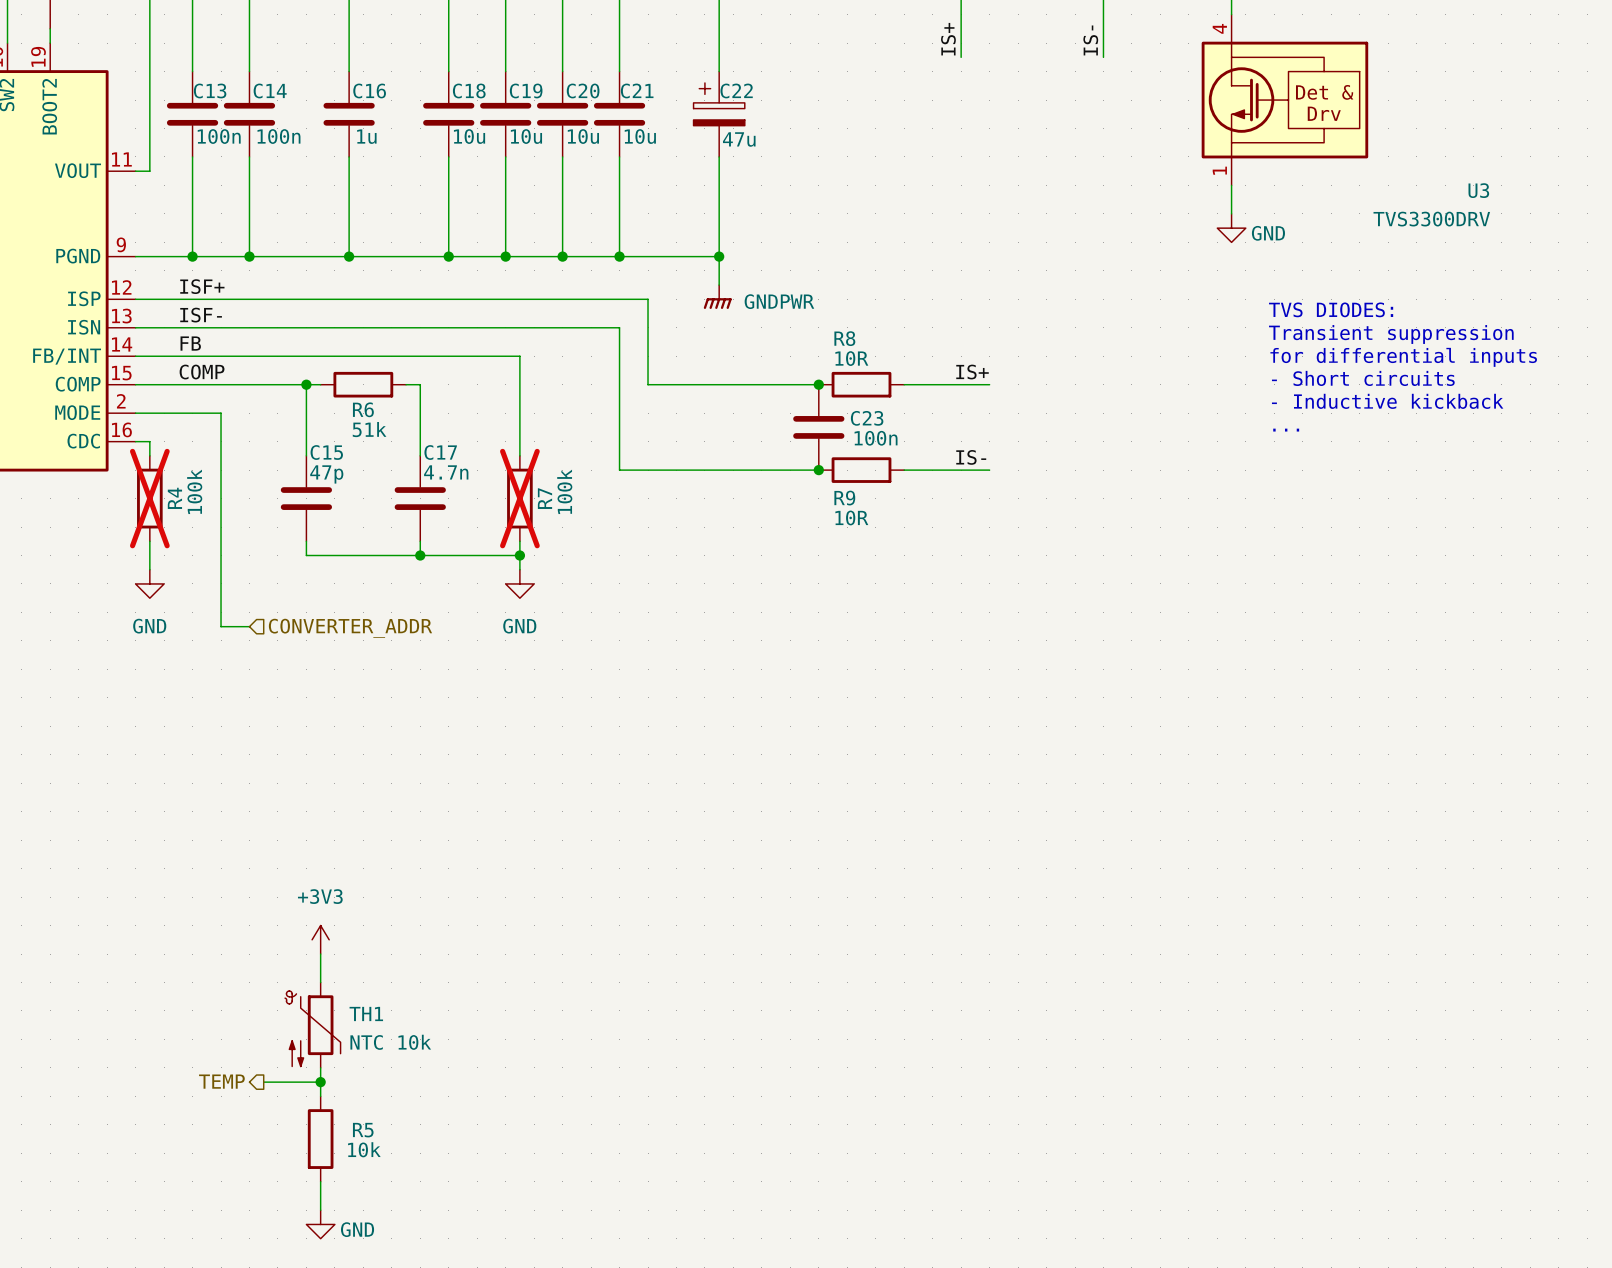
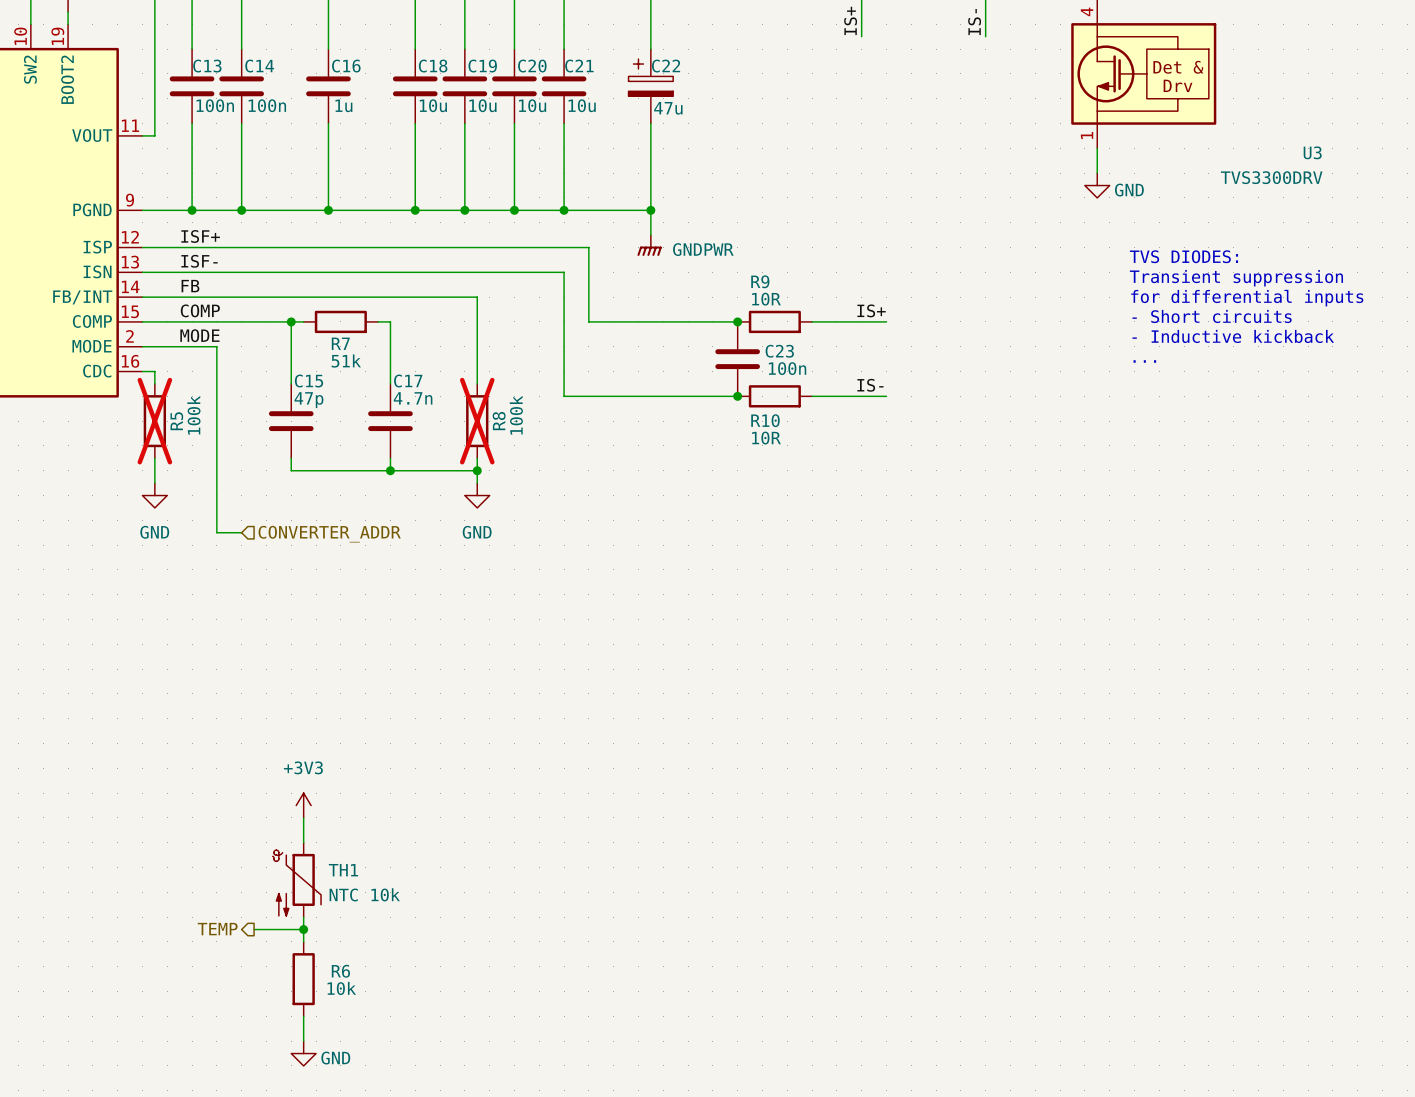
R8 name: R8 (844, 338) -> R9 (760, 281)
label: none -> MODE (199, 335)
R6 name: R6 (363, 409) -> R7 (340, 343)
R4 name: R4 (174, 498) -> R5 (176, 421)
R7 name: R7 (544, 498) -> R8 (499, 421)
R9 name: R9 (844, 498) -> R10 (765, 420)
R5 name: R5 (363, 1130) -> R6 (340, 971)

